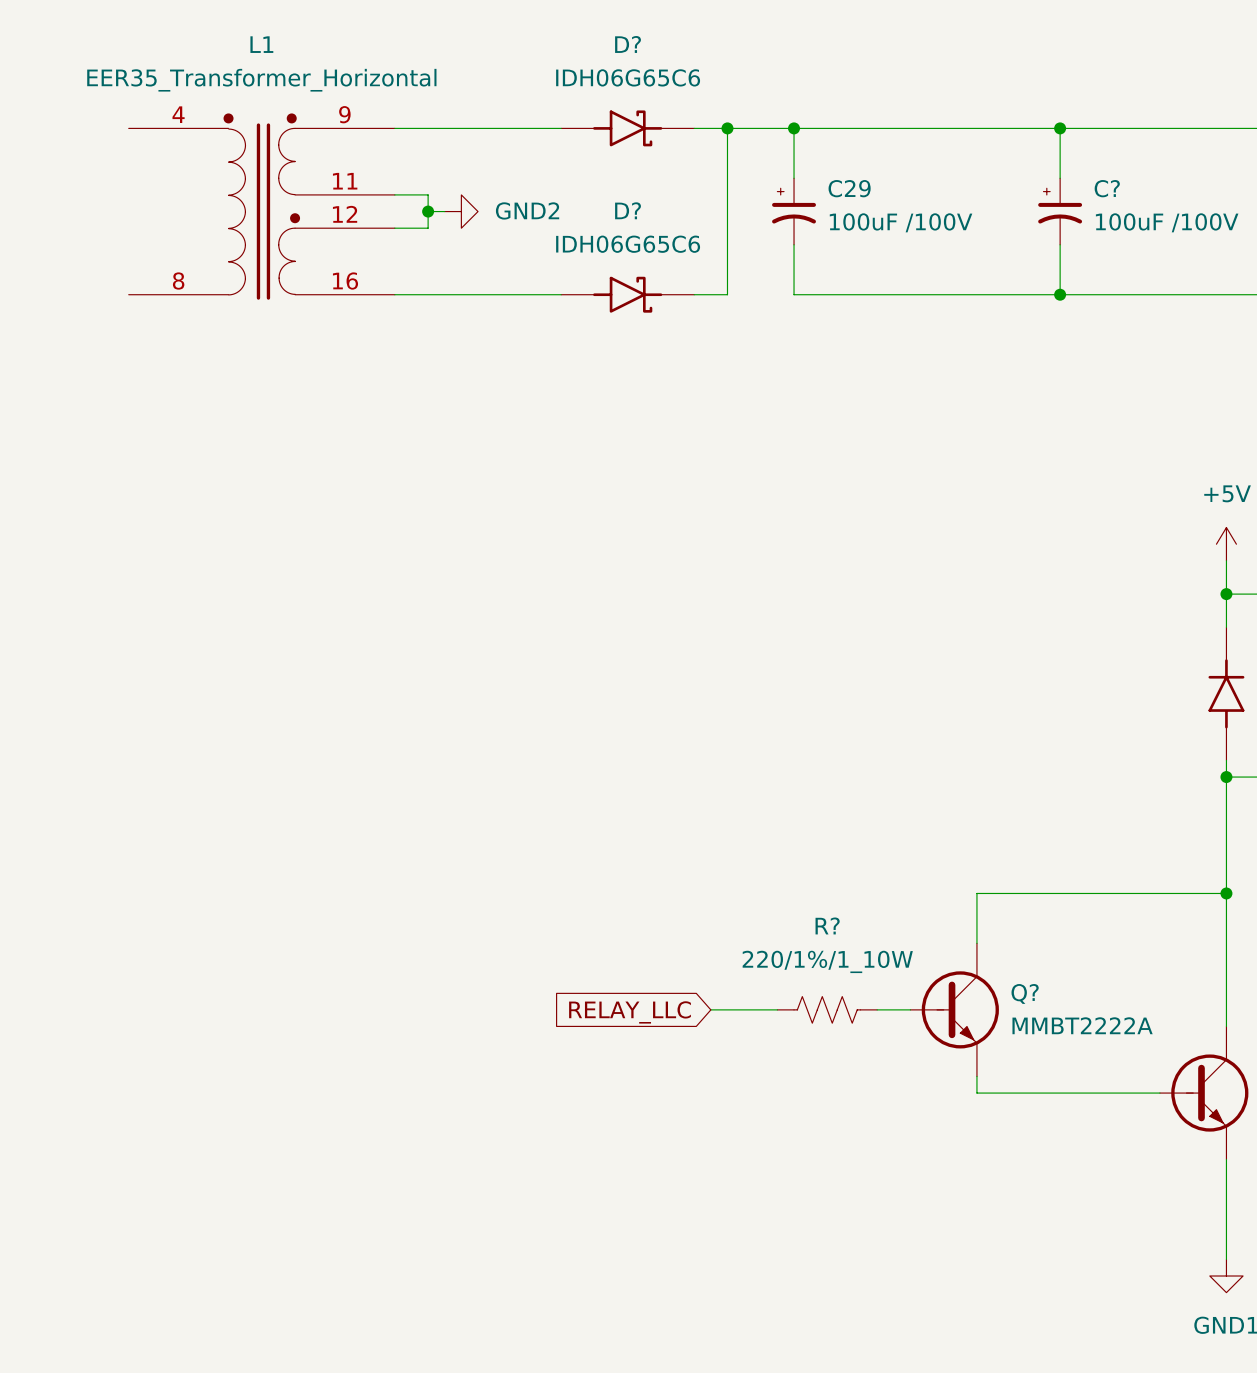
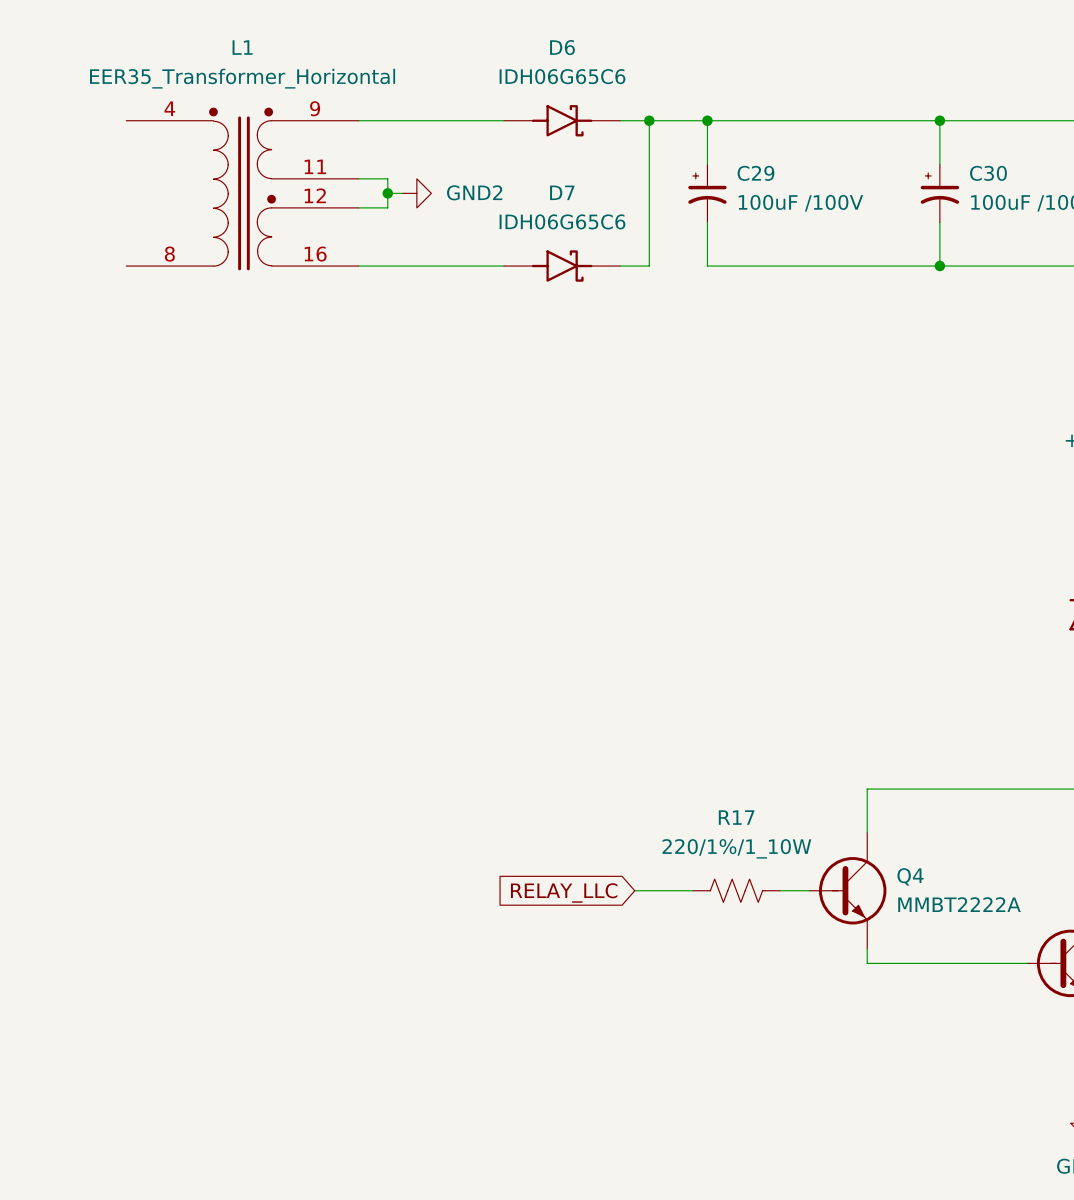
D? name: D? (628, 44) -> D6 (562, 47)
C? name: C? (1107, 188) -> C30 (988, 173)
D? name: D? (628, 210) -> D7 (562, 192)
R? name: R? (827, 925) -> R17 (736, 817)
Q? name: Q? (1025, 993) -> Q4 (910, 876)

